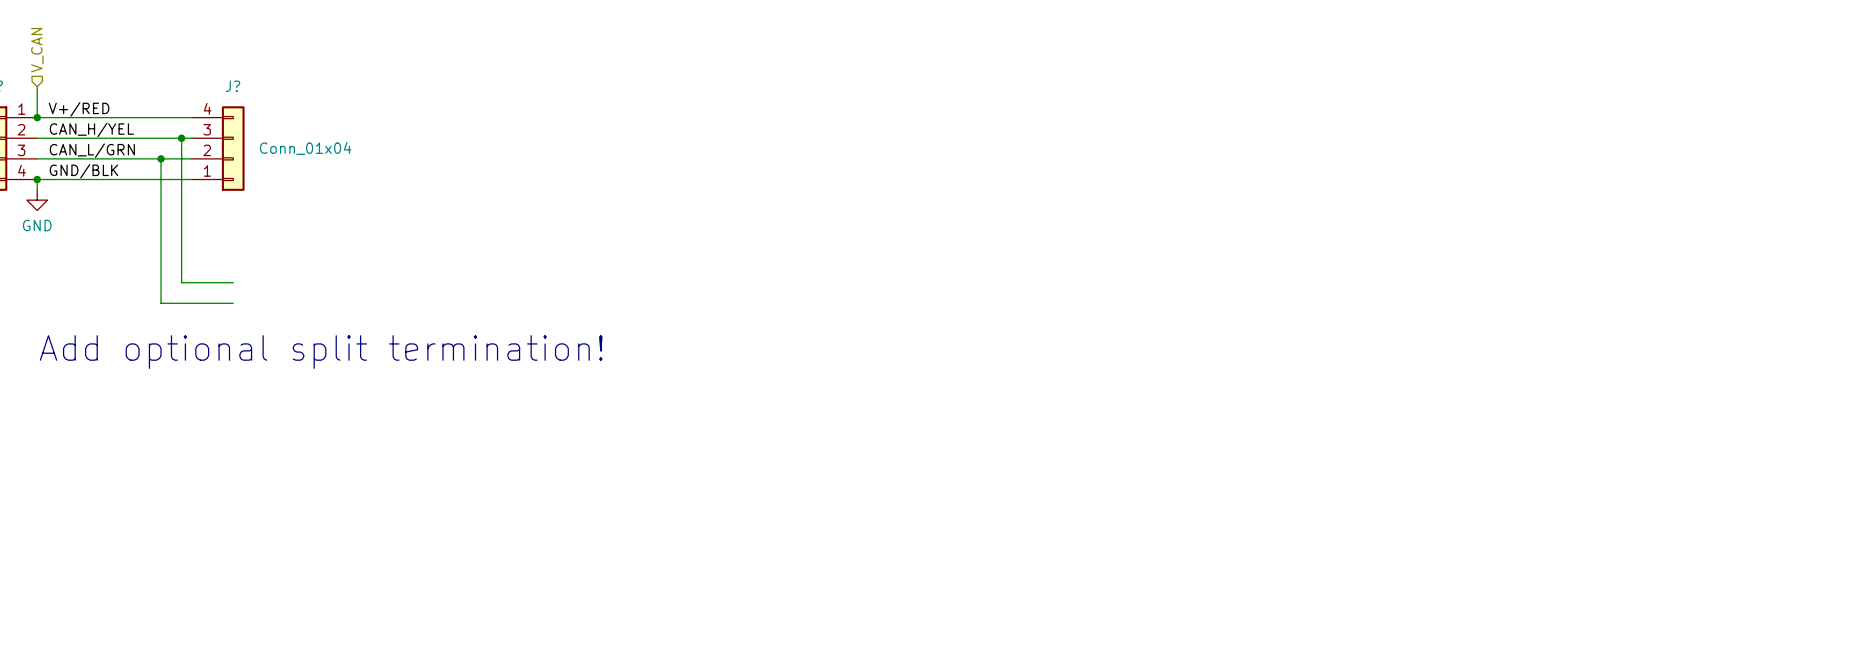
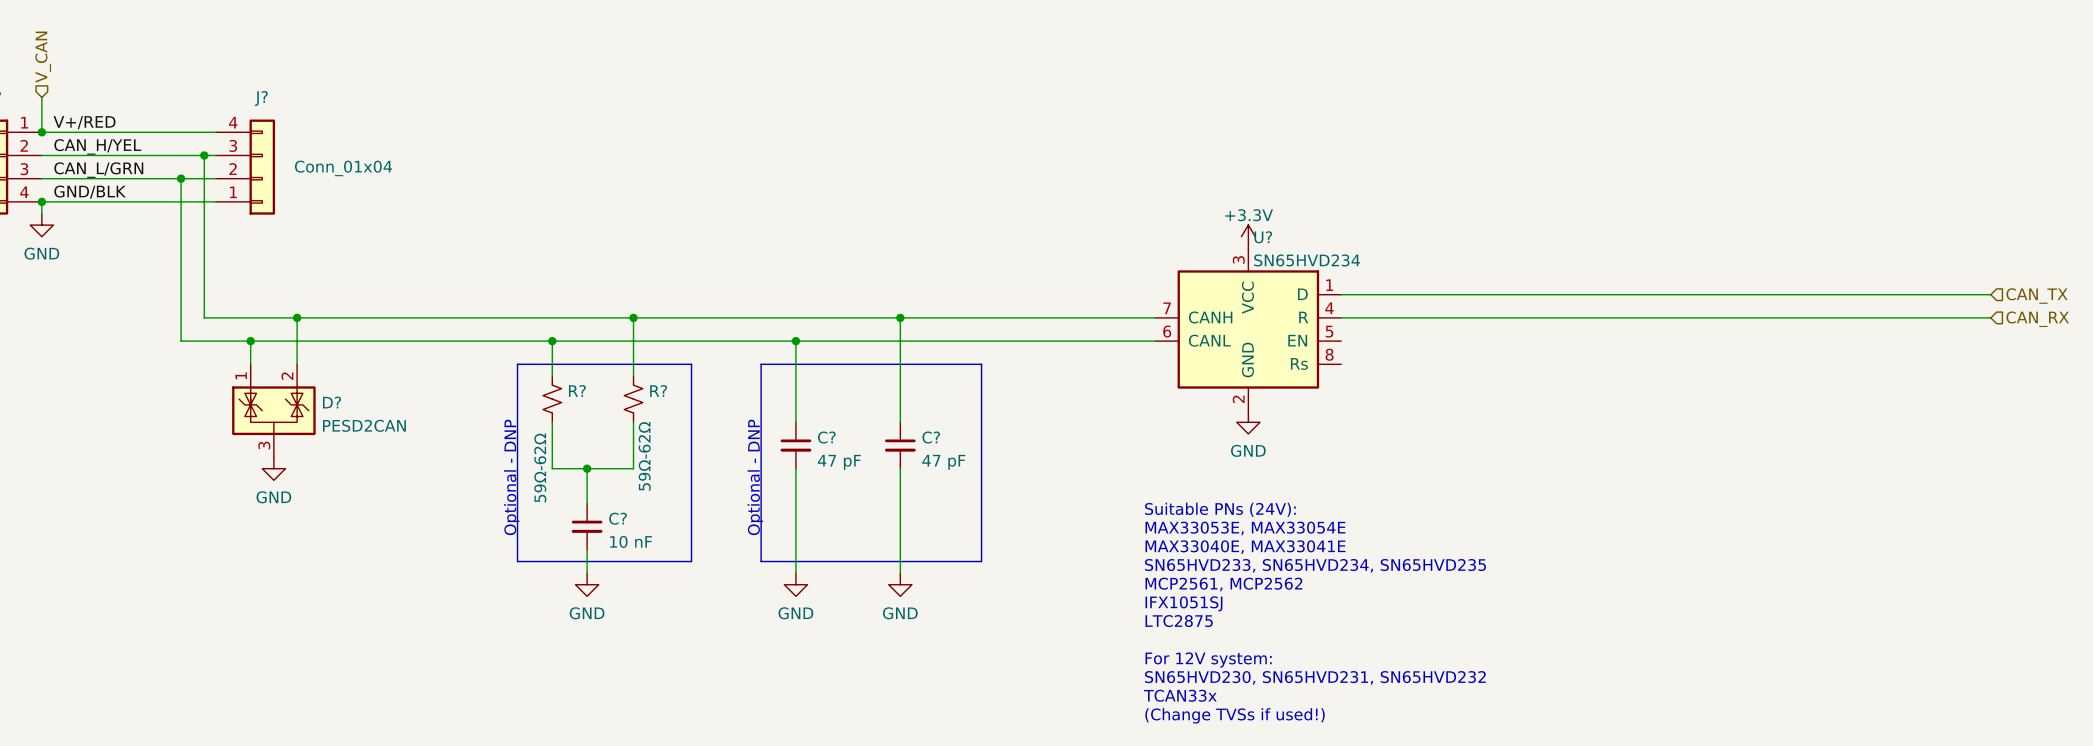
power symbol: none -> +3.3V (1248, 236)
wire: none -> (1341, 294) (1990, 294)
hierarchical label: none -> CAN_TX (2037, 296)
wire: none -> (262, 317) (1155, 317)
wire: none -> (297, 317) (297, 364)
junction: none -> (297, 317)
wire: none -> (633, 317) (633, 375)
junction: none -> (633, 317)
wire: none -> (900, 317) (900, 422)
junction: none -> (900, 317)
wire: none -> (1341, 317) (1990, 317)
hierarchical label: none -> CAN_RX (2037, 319)
U?: none -> SN65HVD234 (1248, 329)
wire: none -> (250, 341) (250, 364)
junction: none -> (250, 341)
wire: none -> (262, 341) (1155, 341)
wire: none -> (552, 341) (552, 375)
junction: none -> (552, 341)
wire: none -> (795, 341) (795, 422)
junction: none -> (795, 341)
line: none -> (517, 364) (691, 364) (691, 561) (517, 561) (517, 364)
line: none -> (761, 364) (981, 364) (981, 561) (761, 561) (761, 364)
text: Add optional split termination! (321, 352) -> none
R?: none -> 59Ω-62Ω (552, 399)
R?: none -> 59Ω-62Ω (633, 399)
D?: none -> PESD2CAN (273, 410)
wire: none -> (552, 422) (552, 468) (633, 468) (633, 422)
power symbol: none -> GND (1248, 422)
C?: none -> 47 pF (795, 445)
C?: none -> 47 pF (900, 445)
text: none -> Optional - DNP (511, 477)
text: none -> Optional - DNP (755, 477)
power symbol: none -> GND (273, 468)
wire: none -> (587, 468) (587, 503)
junction: none -> (587, 468)
wire: none -> (795, 468) (795, 573)
wire: none -> (900, 468) (900, 573)
text: none -> Suitable PNs (24V): (1220, 509)
C?: none -> 10 nF (587, 526)
text: none -> MAX33053E, MAX33054E (1245, 528)
text: none -> MAX33040E, MAX33041E (1245, 547)
wire: none -> (587, 549) (587, 573)
text: none -> SN65HVD233, SN65HVD234, SN65HVD235 (1315, 565)
power symbol: none -> GND (587, 584)
power symbol: none -> GND (795, 584)
power symbol: none -> GND (900, 584)
text: none -> MCP2561, MCP2562 (1223, 584)
text: none -> IFX1051SJ (1183, 603)
text: none -> LTC2875 (1179, 621)
text: none -> For 12V system: (1208, 659)
text: none -> SN65HVD230, SN65HVD231, SN65HVD232 (1315, 677)
text: none -> TCAN33x (1180, 695)
text: none -> (Change TVSs if used!) (1235, 715)

